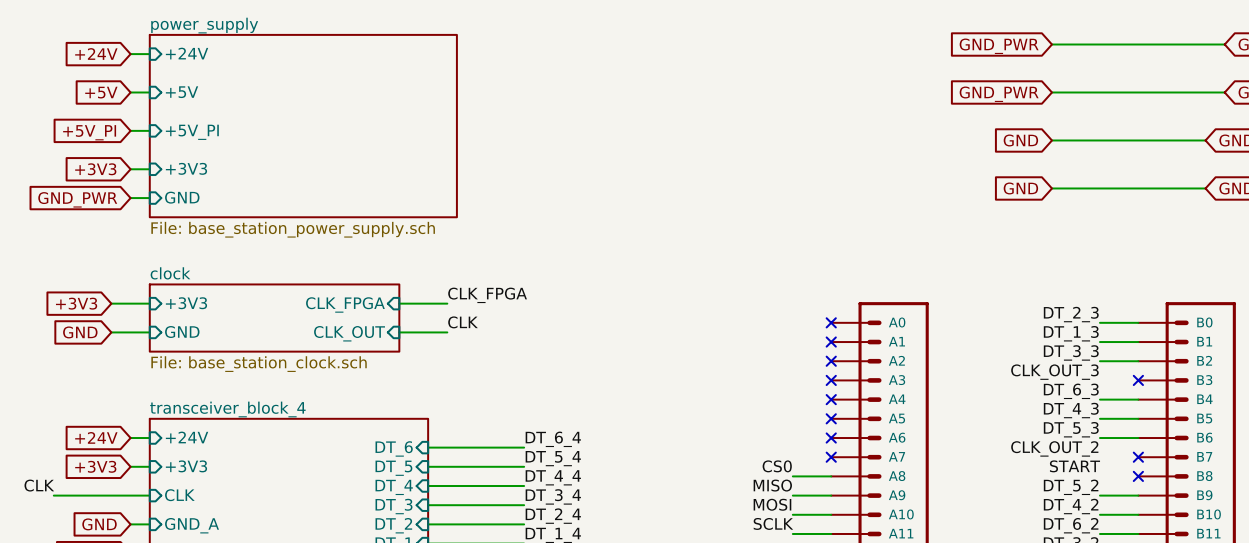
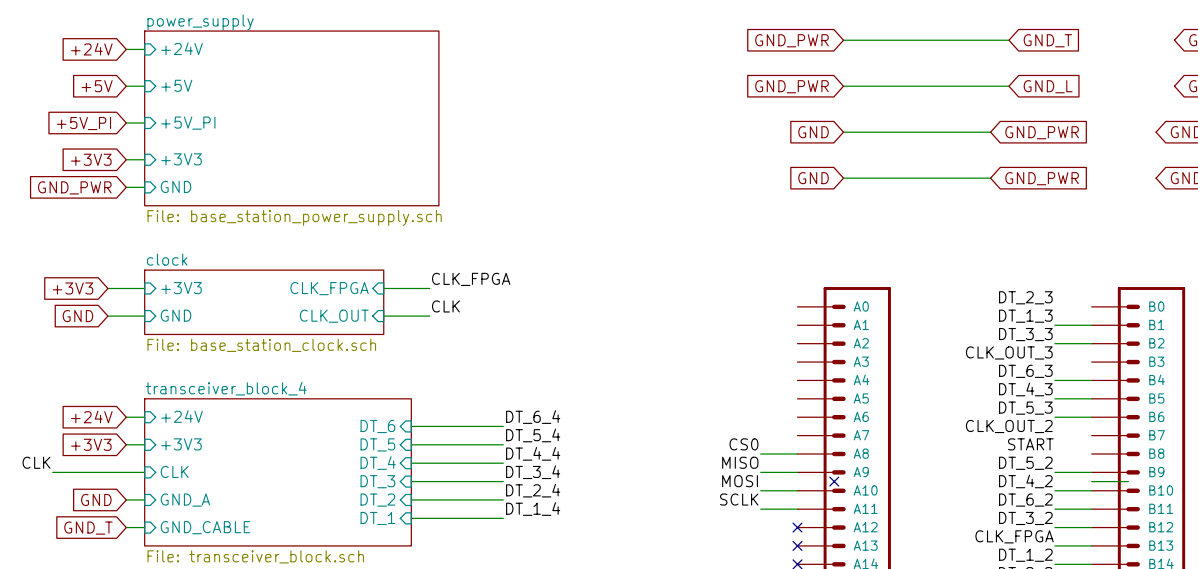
wire: (1051, 44) (1224, 44) -> (1008, 40) (843, 40)
global label: none -> GND_PWR (791, 40)
global label: GND_PWR (999, 46) -> GND_T (1047, 40)
wire: (1051, 92) (1224, 92) -> (1008, 86) (843, 86)
global label: none -> GND_PWR (791, 86)
global label: GND_PWR (999, 94) -> GND_L (1048, 86)
global label: none -> GND (813, 132)
global label: GND (1020, 140) -> none
wire: (1051, 140) (1205, 140) -> (843, 132) (990, 132)
global label: none -> GND_PWR (1042, 132)
global label: none -> GND (813, 178)
global label: GND (1020, 188) -> none
wire: (1051, 188) (1205, 188) -> (843, 178) (990, 178)
global label: none -> GND_PWR (1042, 178)
no-connect mark: (831, 322) -> none
wire: (1099, 322) (1138, 322) -> (1091, 481) (1128, 481)
no-connect mark: (831, 342) -> none
no-connect mark: (831, 361) -> none
no-connect mark: (831, 380) -> none
no-connect mark: (1138, 380) -> none
no-connect mark: (831, 399) -> none
no-connect mark: (831, 418) -> none
no-connect mark: (831, 438) -> none
no-connect mark: (831, 457) -> none
no-connect mark: (1138, 457) -> none
no-connect mark: (1138, 476) -> none
no-connect mark: none -> (834, 481)

